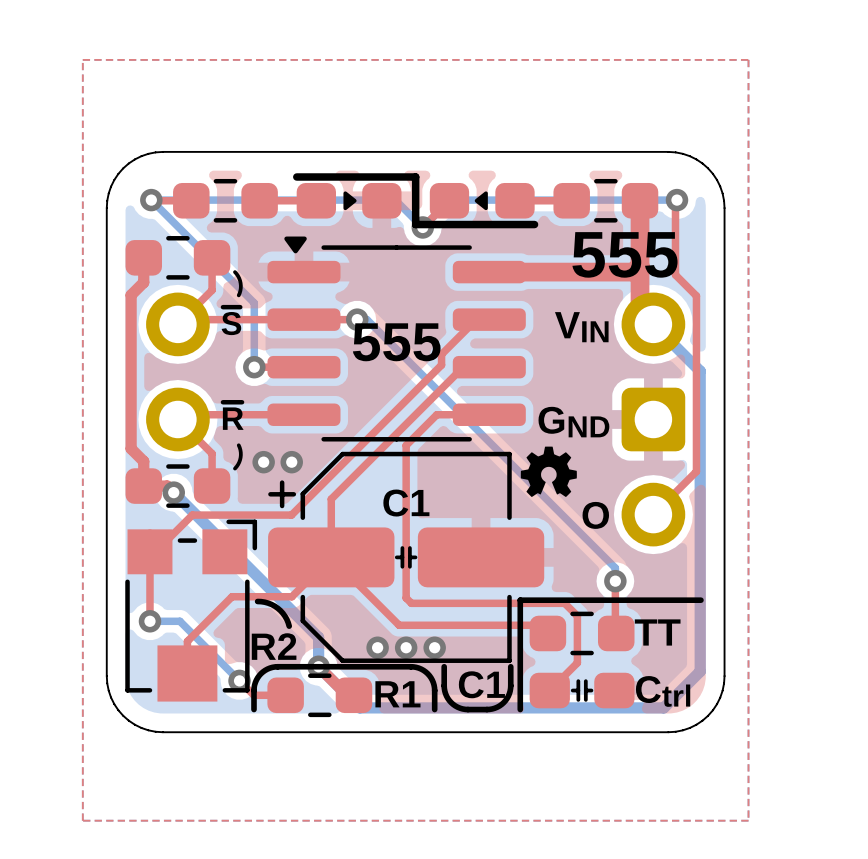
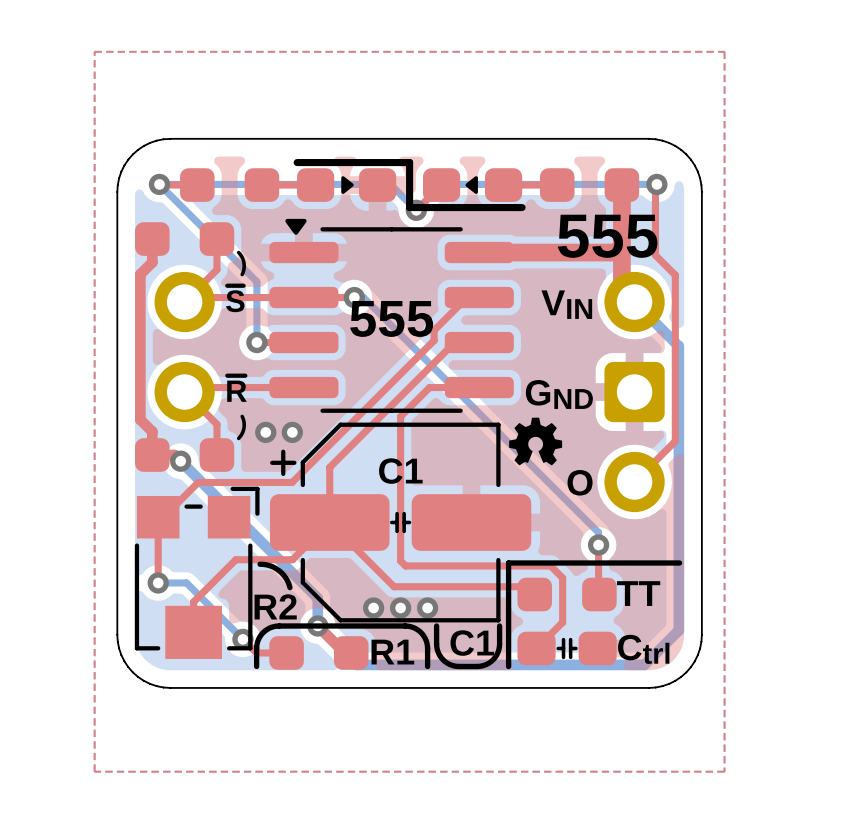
part footprint: [173, 178, 278, 223] -> [180, 168, 280, 202]
part footprint: [553, 178, 659, 223] -> [539, 168, 640, 202]
part footprint: [125, 236, 231, 280] -> [135, 222, 235, 256]
part footprint: [125, 464, 231, 508] -> [135, 438, 235, 472]
part footprint: [529, 611, 635, 656] -> [517, 577, 617, 612]
part footprint: [267, 673, 373, 718] -> [269, 636, 369, 670]

